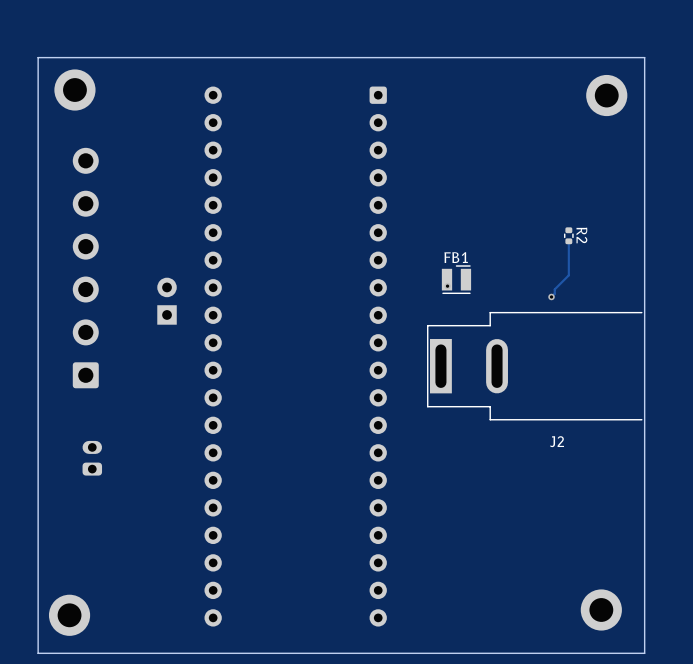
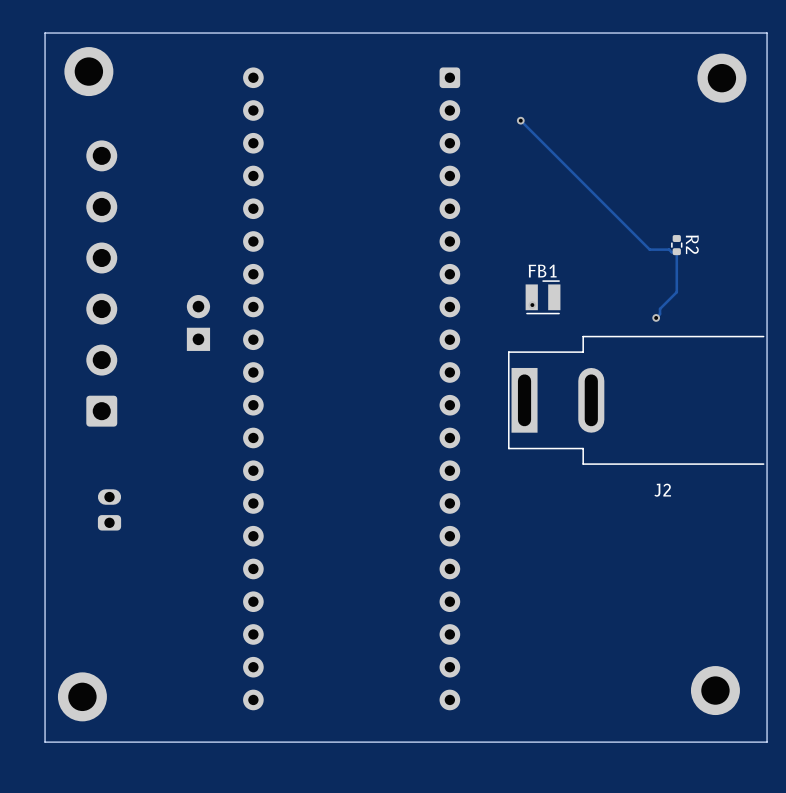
track: none -> (520, 120) (649, 249) (676, 251)
via: none -> (520, 120)

